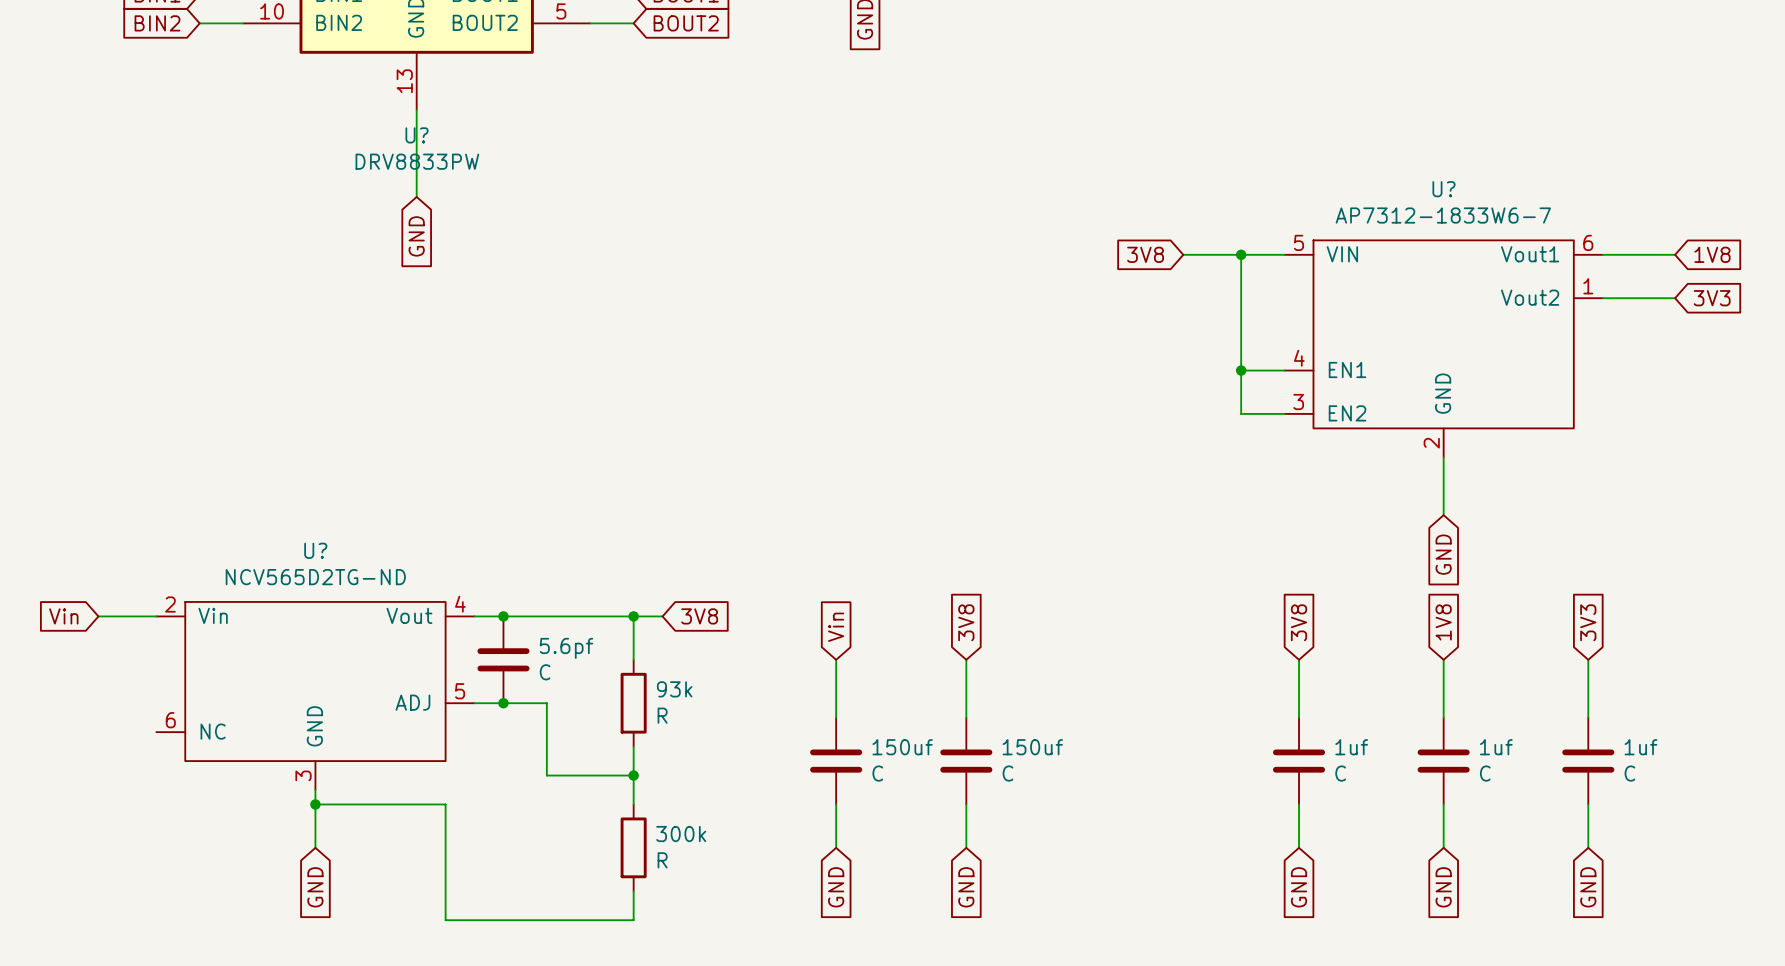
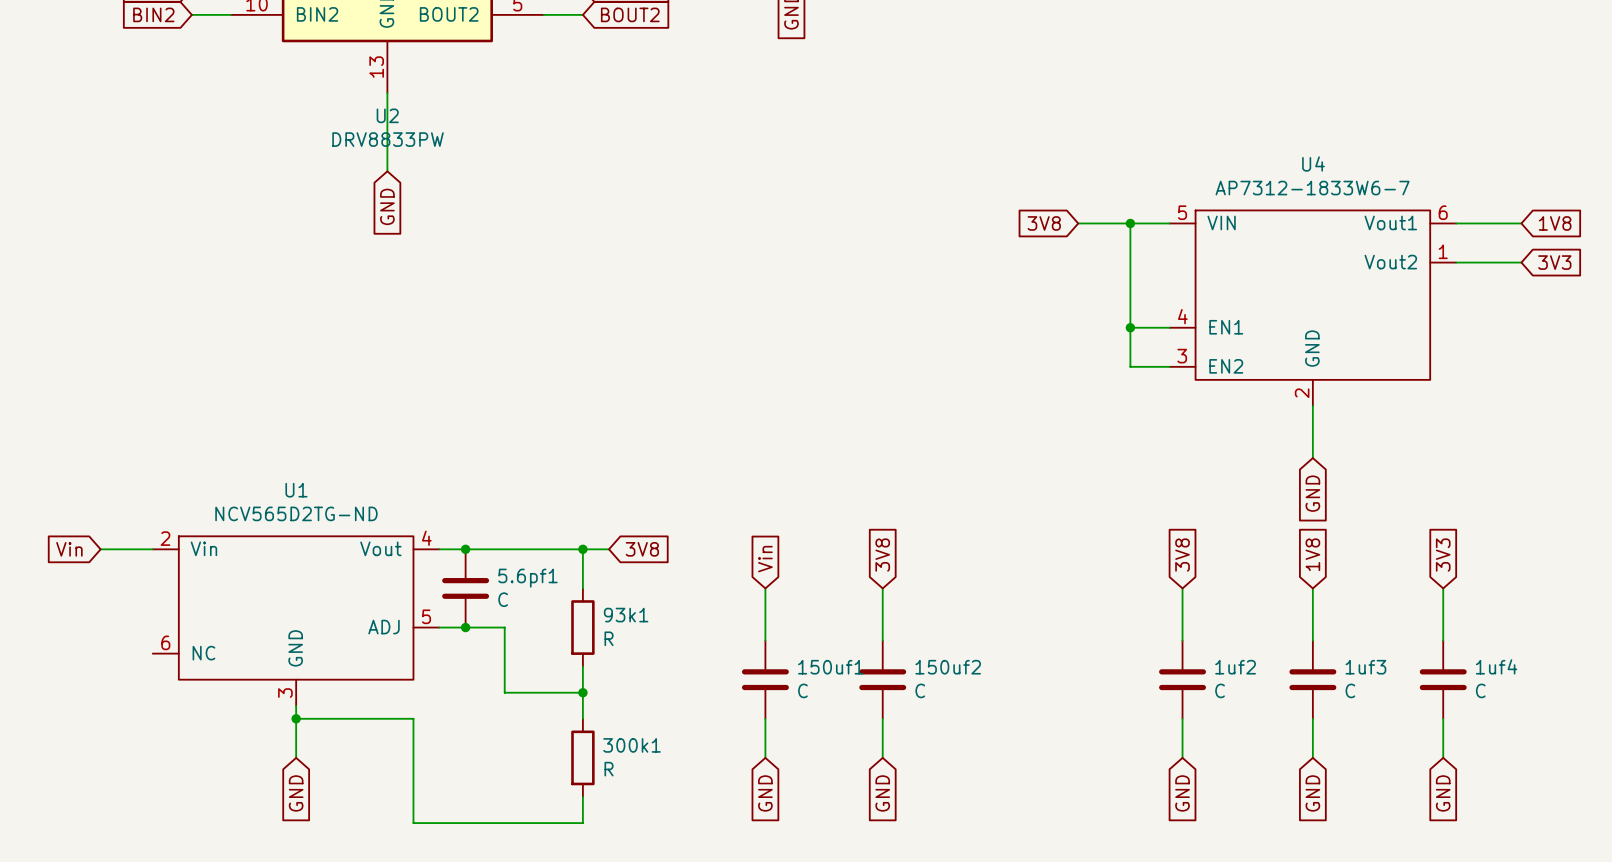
U? name: U? (417, 135) -> U2 (387, 115)
U? name: U? (1444, 189) -> U4 (1313, 164)
U? name: U? (315, 550) -> U1 (296, 490)
5.6pf name: 5.6pf (566, 648) -> 5.6pf1 (527, 578)
93k name: 93k (674, 689) -> 93k1 (626, 615)
150uf name: 150uf (902, 747) -> 150uf1 (830, 667)
150uf name: 150uf (1032, 747) -> 150uf2 (948, 667)
1uf name: 1uf (1351, 747) -> 1uf2 (1235, 667)
1uf name: 1uf (1496, 747) -> 1uf3 (1365, 667)
1uf name: 1uf (1640, 747) -> 1uf4 (1496, 666)
300k name: 300k (681, 834) -> 300k1 (631, 745)

